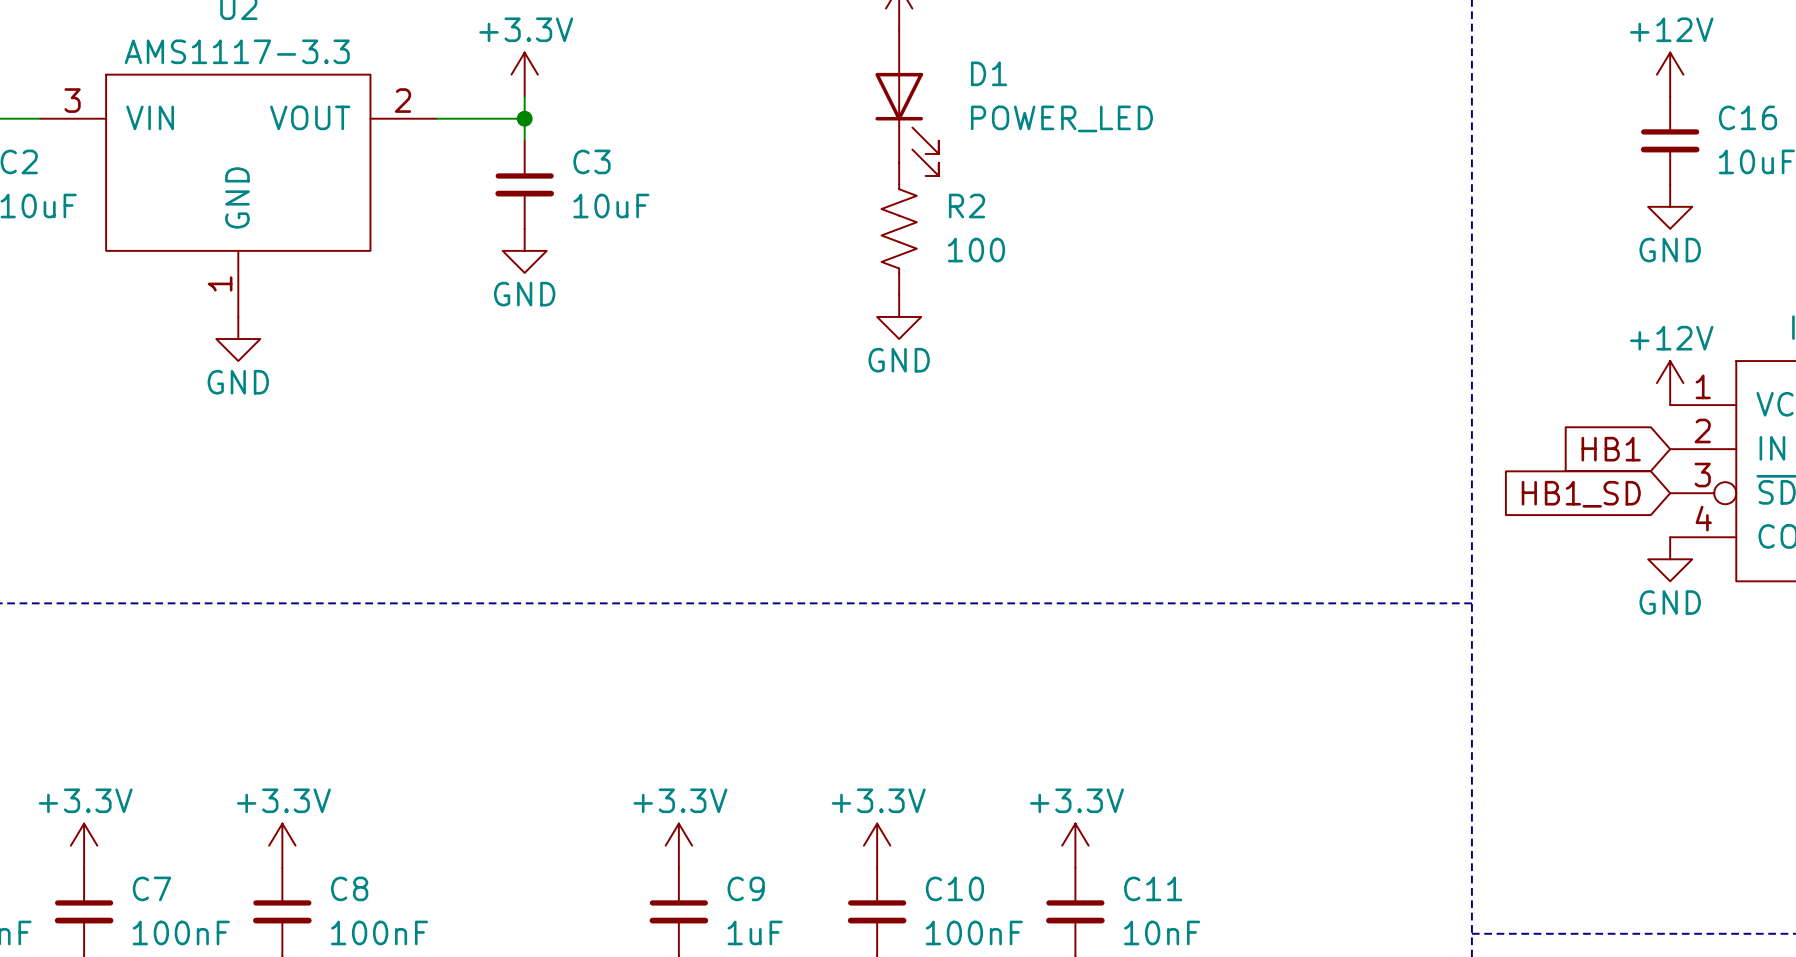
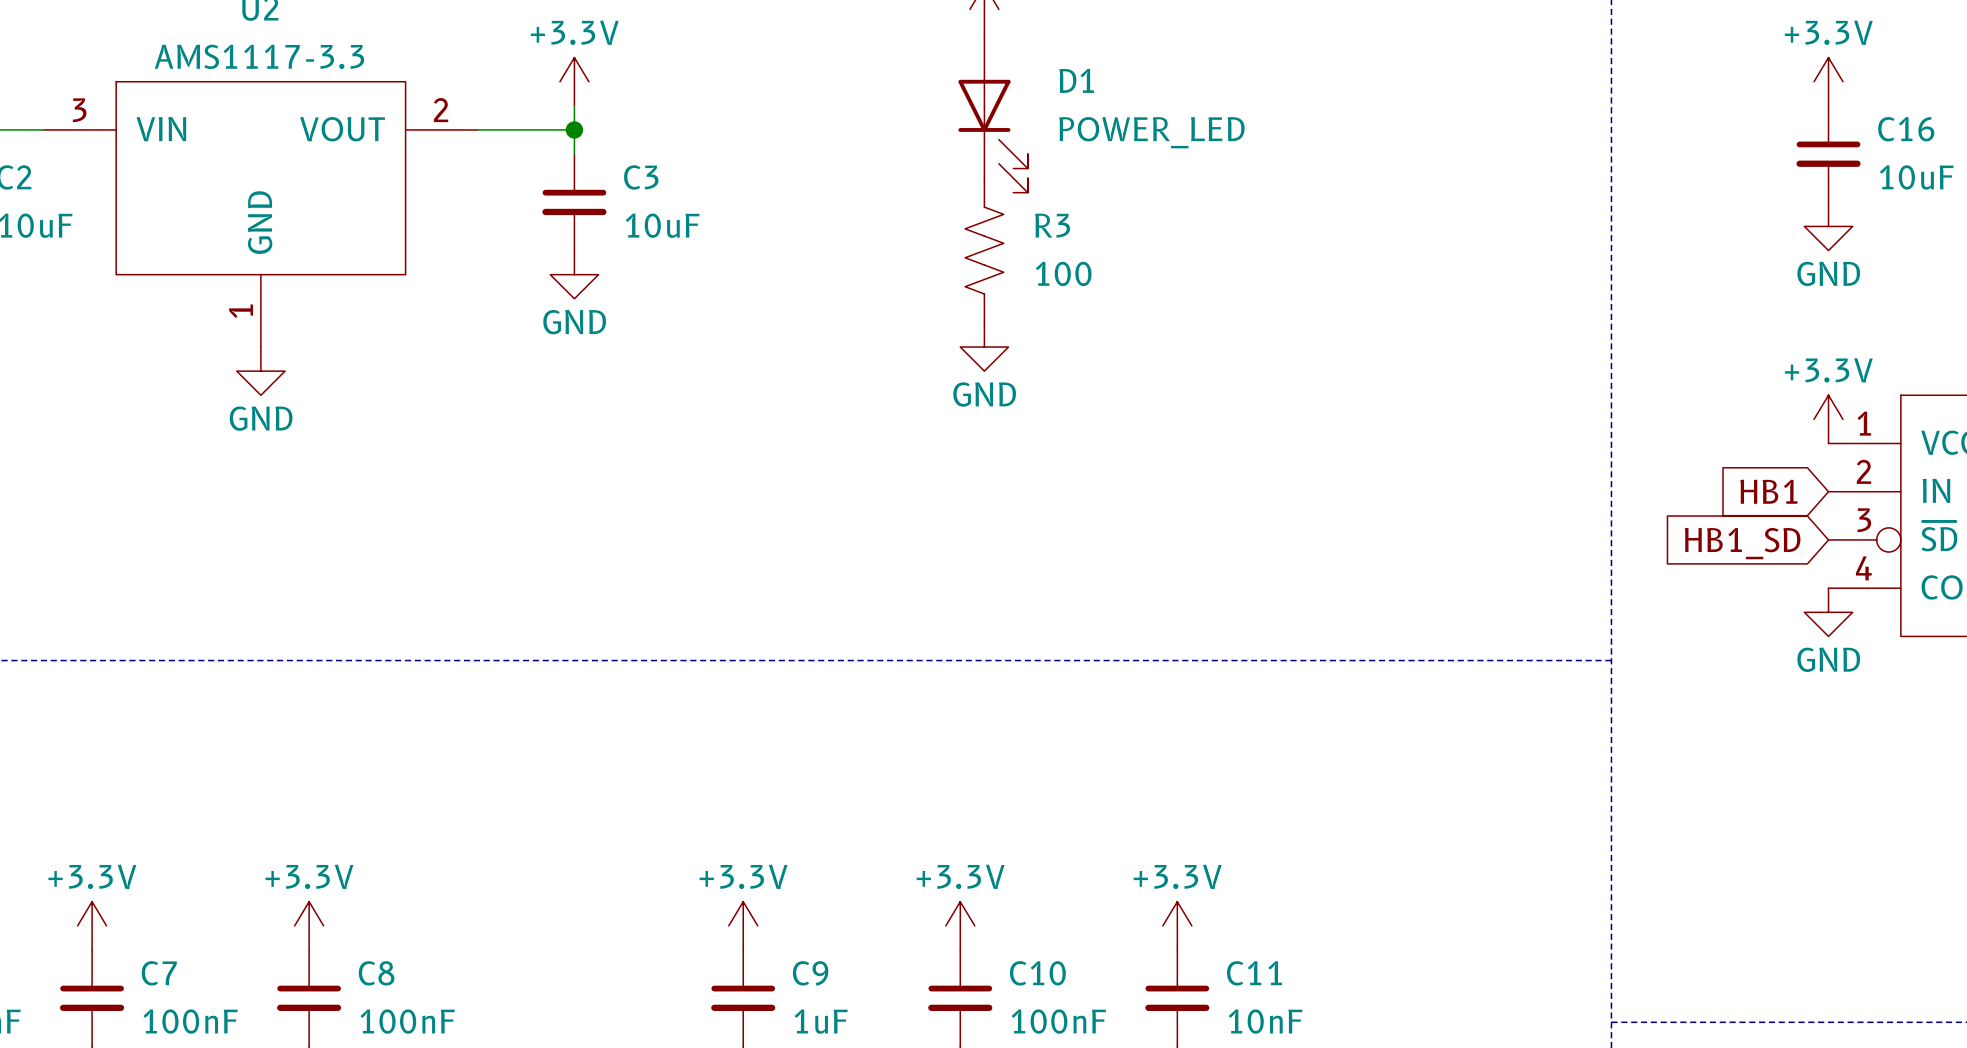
power symbol: +12V (1670, 74) -> +3.3V (1828, 81)
R2 name: R2 (966, 206) -> R3 (1052, 225)
power symbol: +12V (1670, 383) -> +3.3V (1828, 419)

